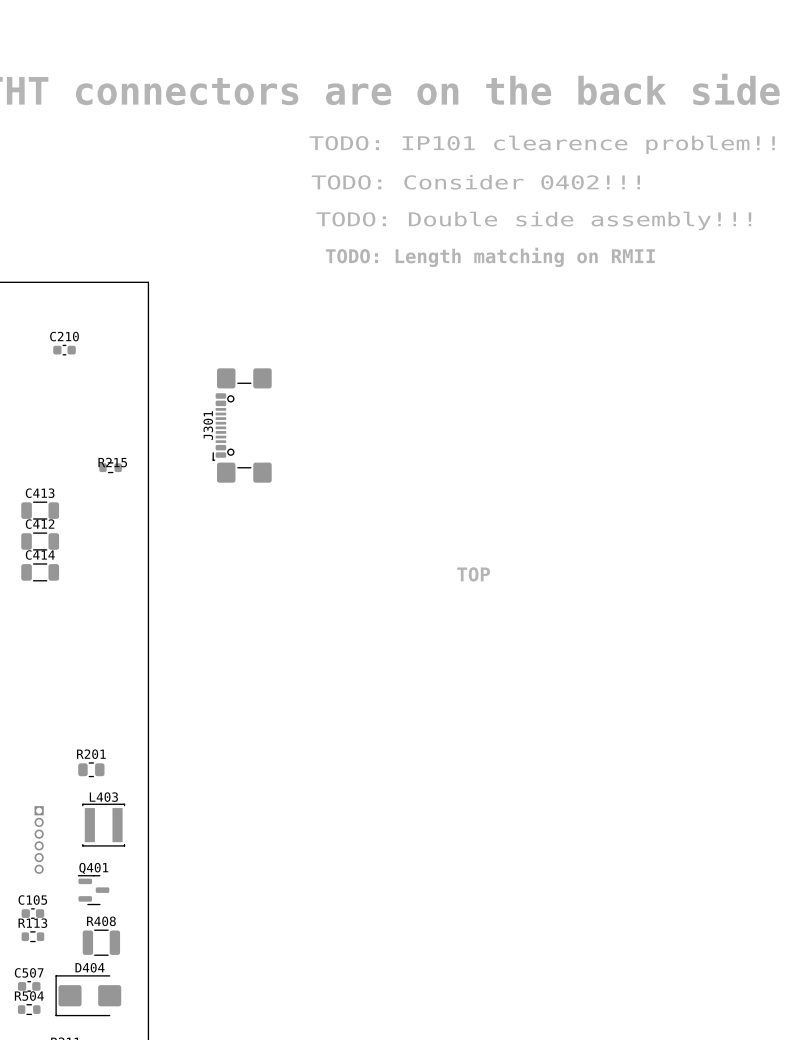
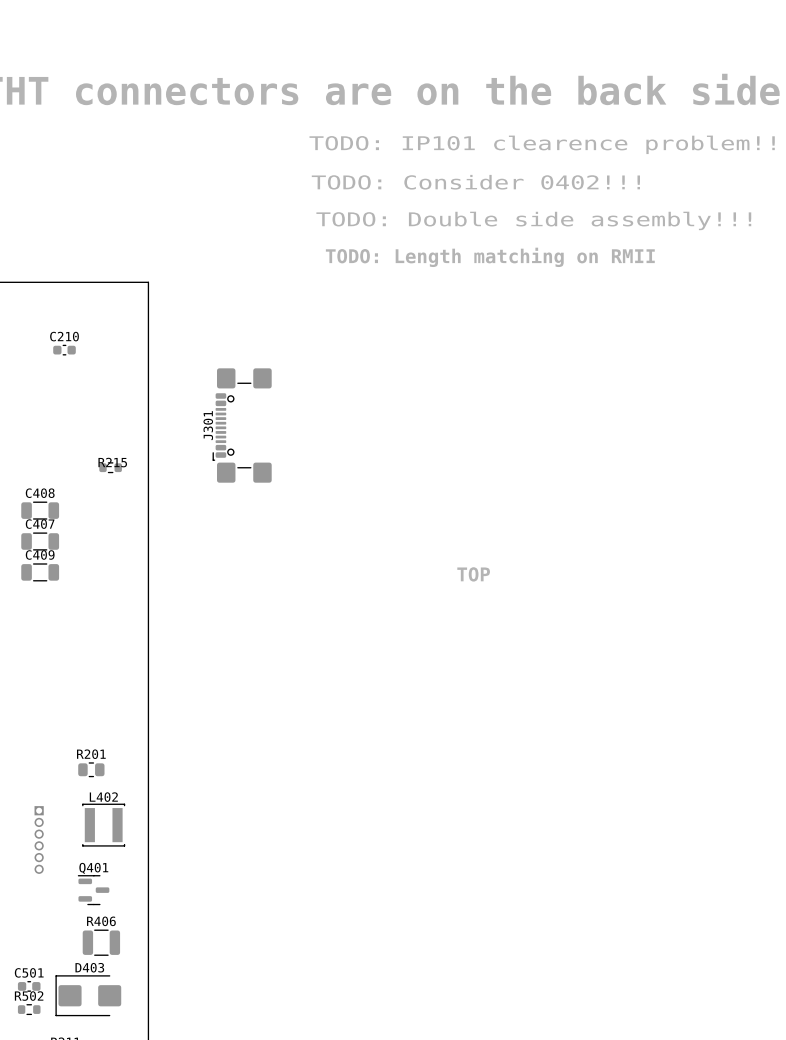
C413 name: C413 (40, 493) -> C408 (40, 493)
C412 name: C412 (40, 524) -> C407 (40, 524)
C414 name: C414 (40, 554) -> C409 (40, 554)
L403 name: L403 (103, 797) -> L402 (103, 797)
C105: (32, 913) -> none
R408 name: R408 (101, 921) -> R406 (101, 921)
R113: (32, 936) -> none
D404 name: D404 (89, 967) -> D403 (89, 967)
C507 name: C507 (29, 972) -> C501 (29, 972)
R504 name: R504 (29, 996) -> R502 (29, 996)

